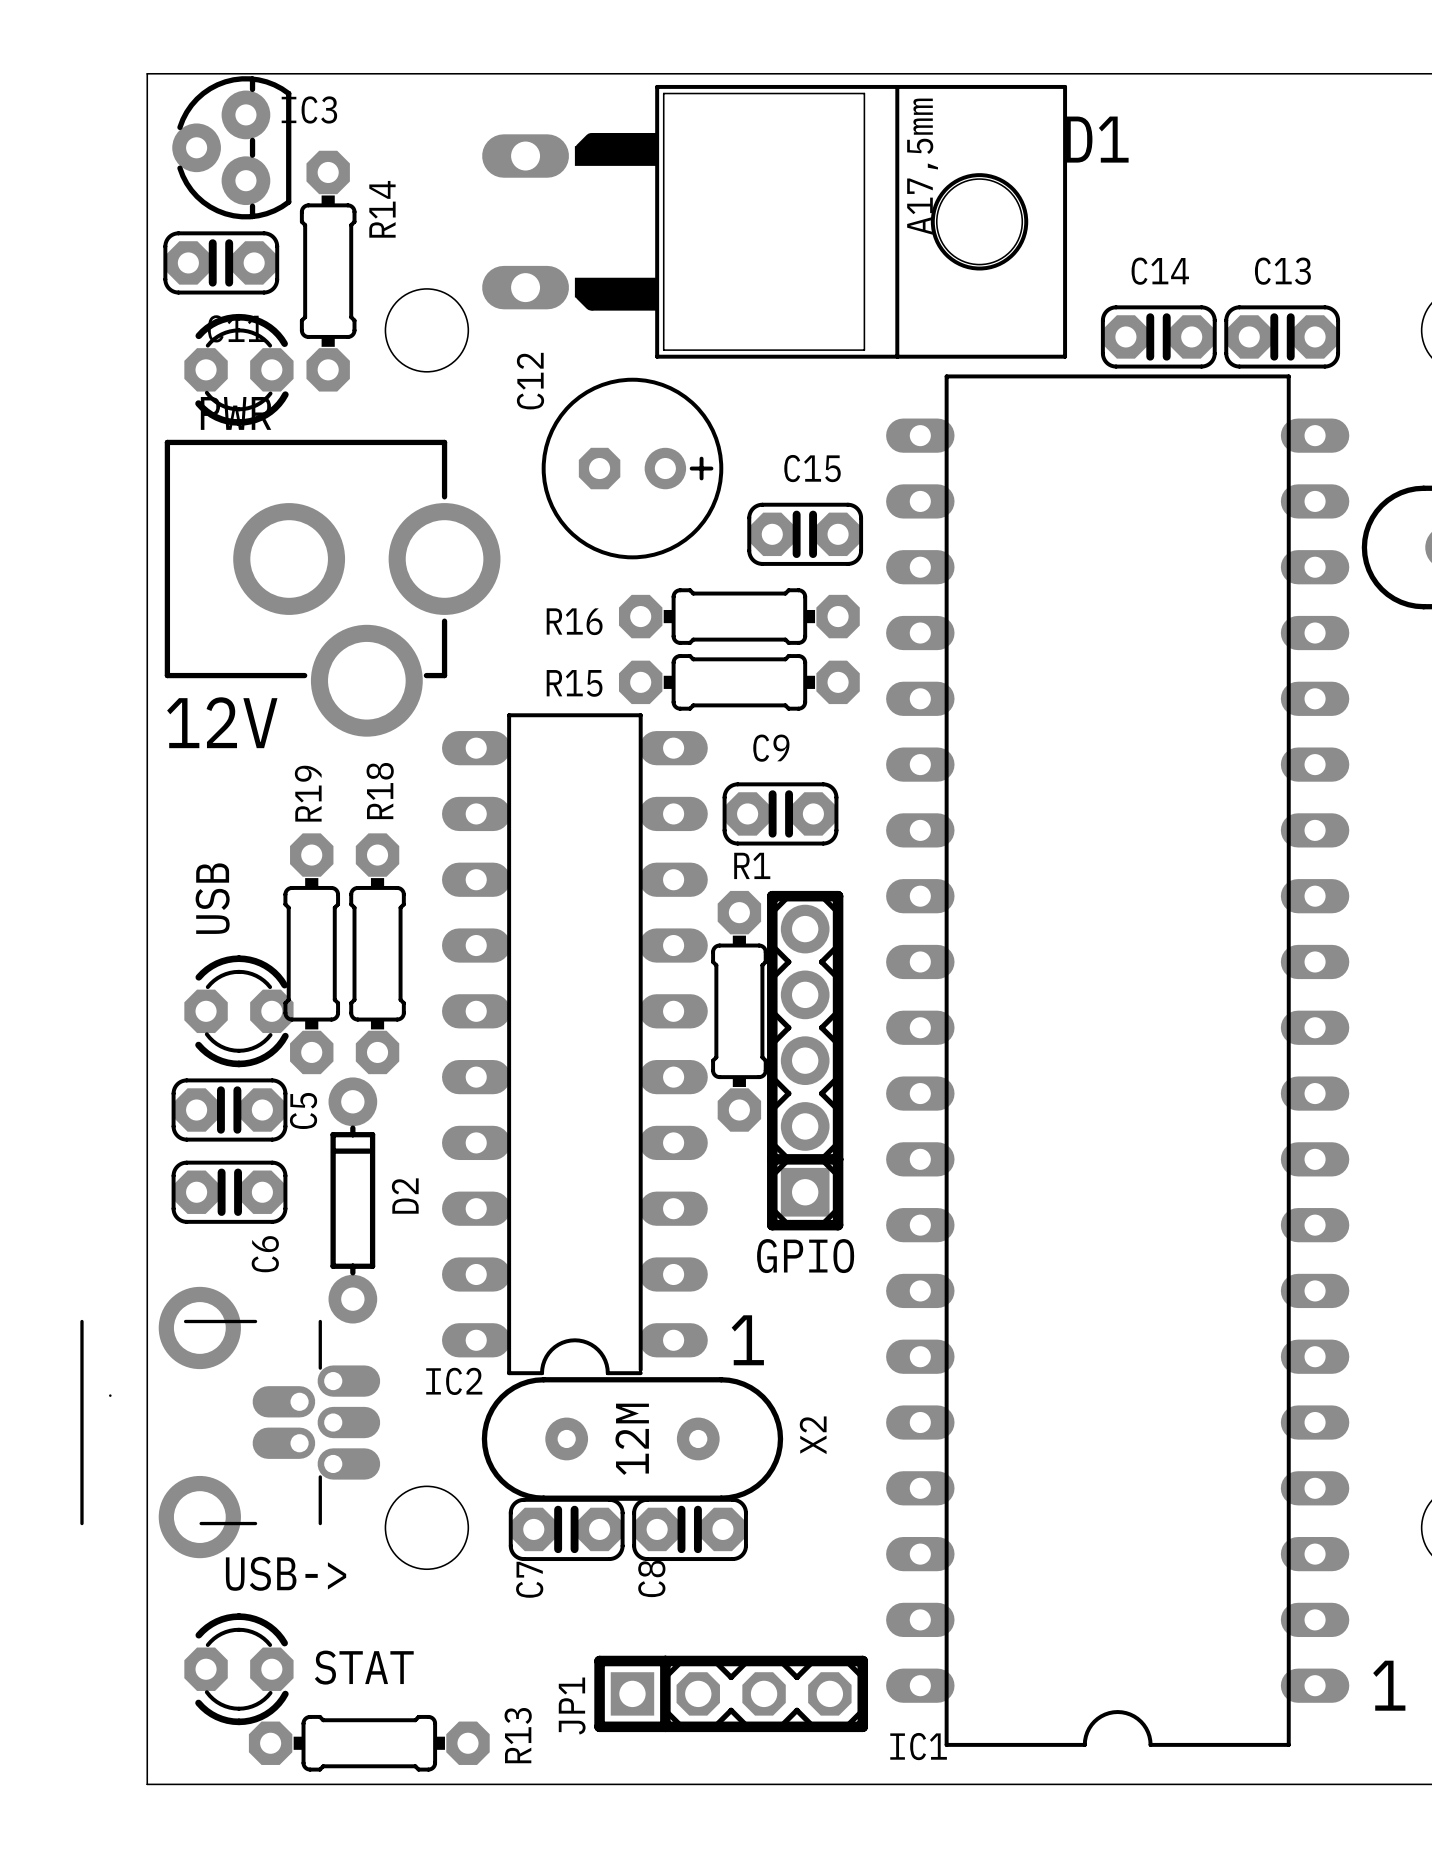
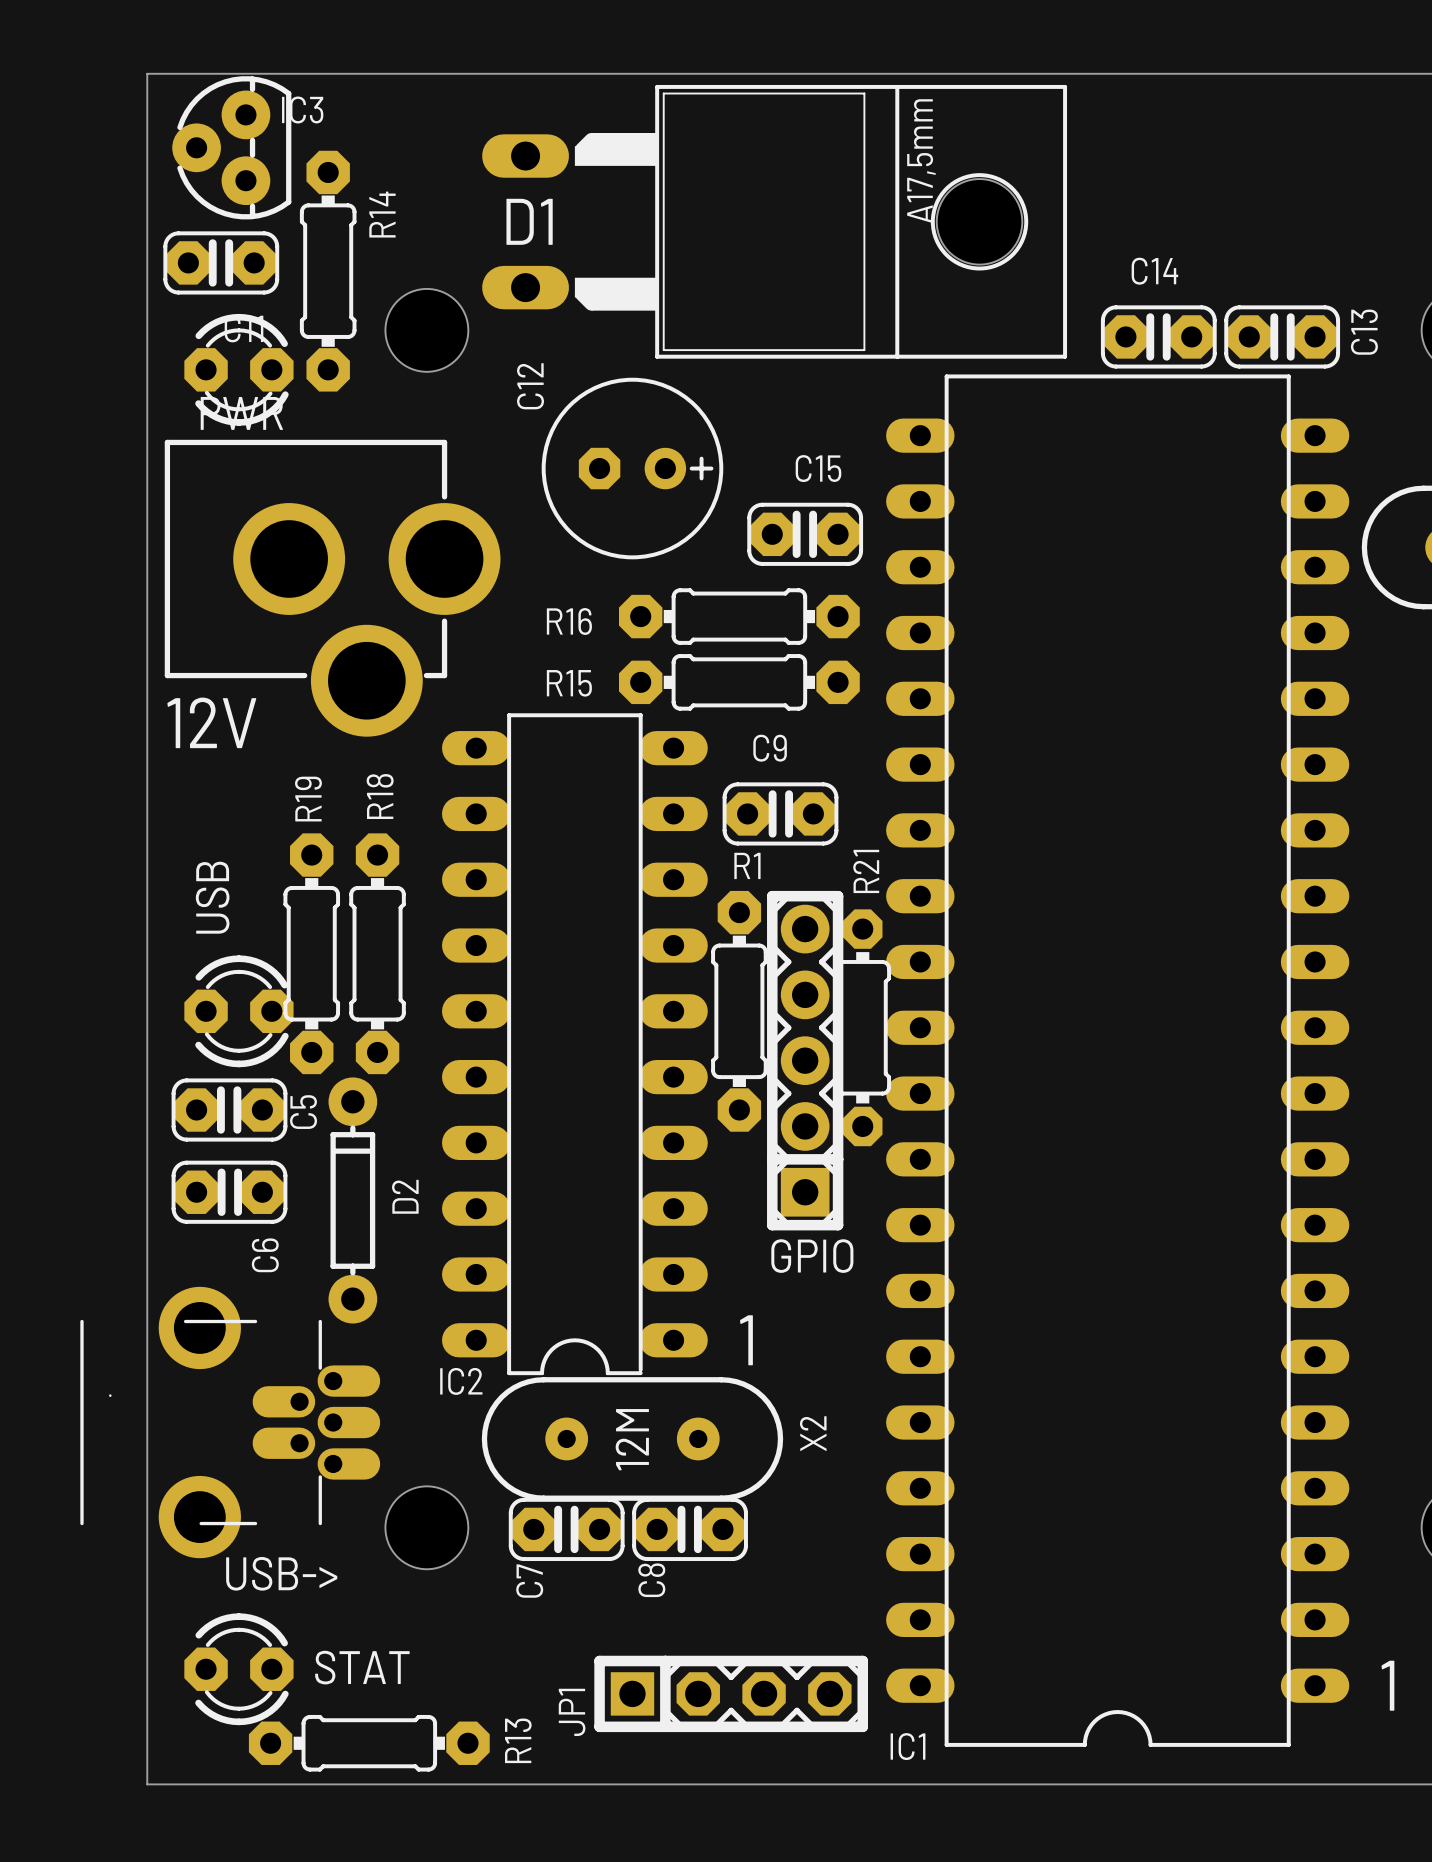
D1 name position: D1 (1097, 139) -> D1 (529, 221)
C13 name rotation: 0° (1282, 271) -> 90° counterclockwise (1364, 332)
C13 name position: C13 (1282, 271) -> C13 (1364, 332)
R21: none -> (862, 1027)

